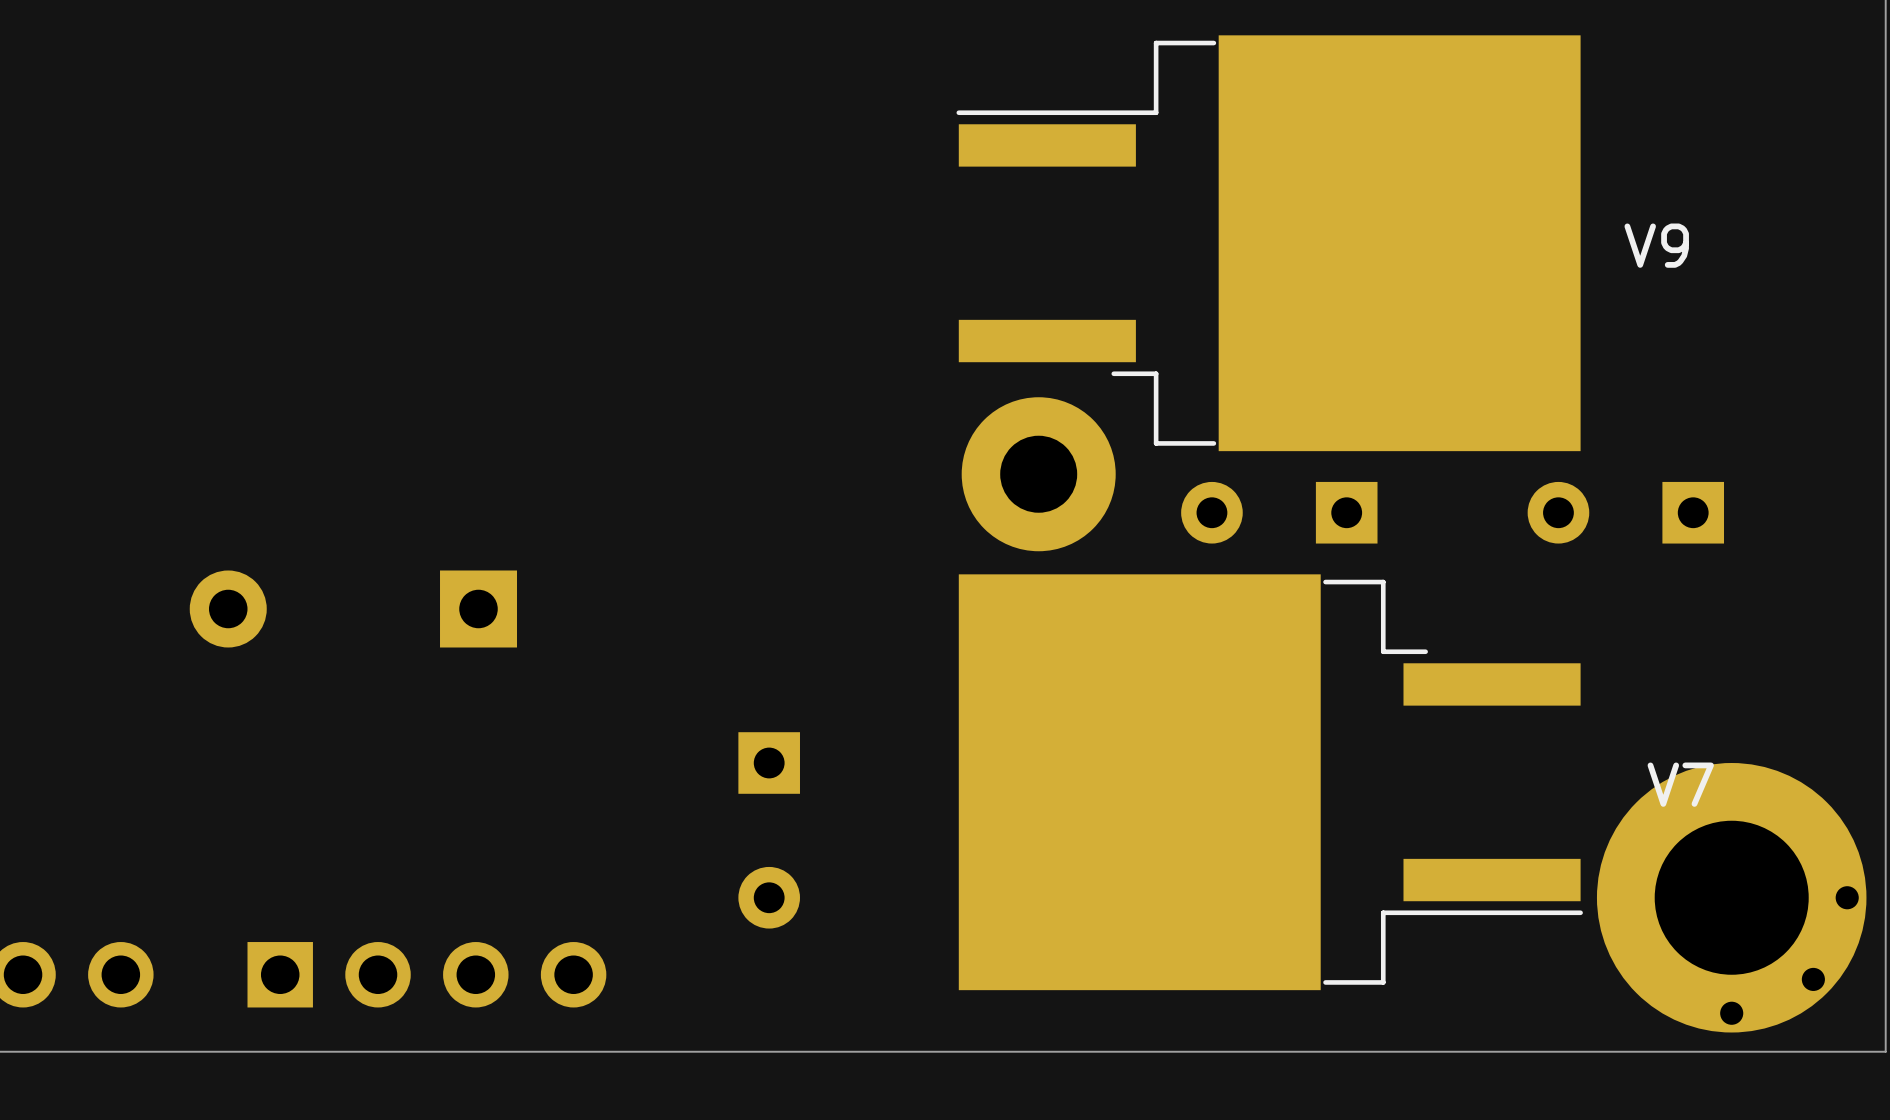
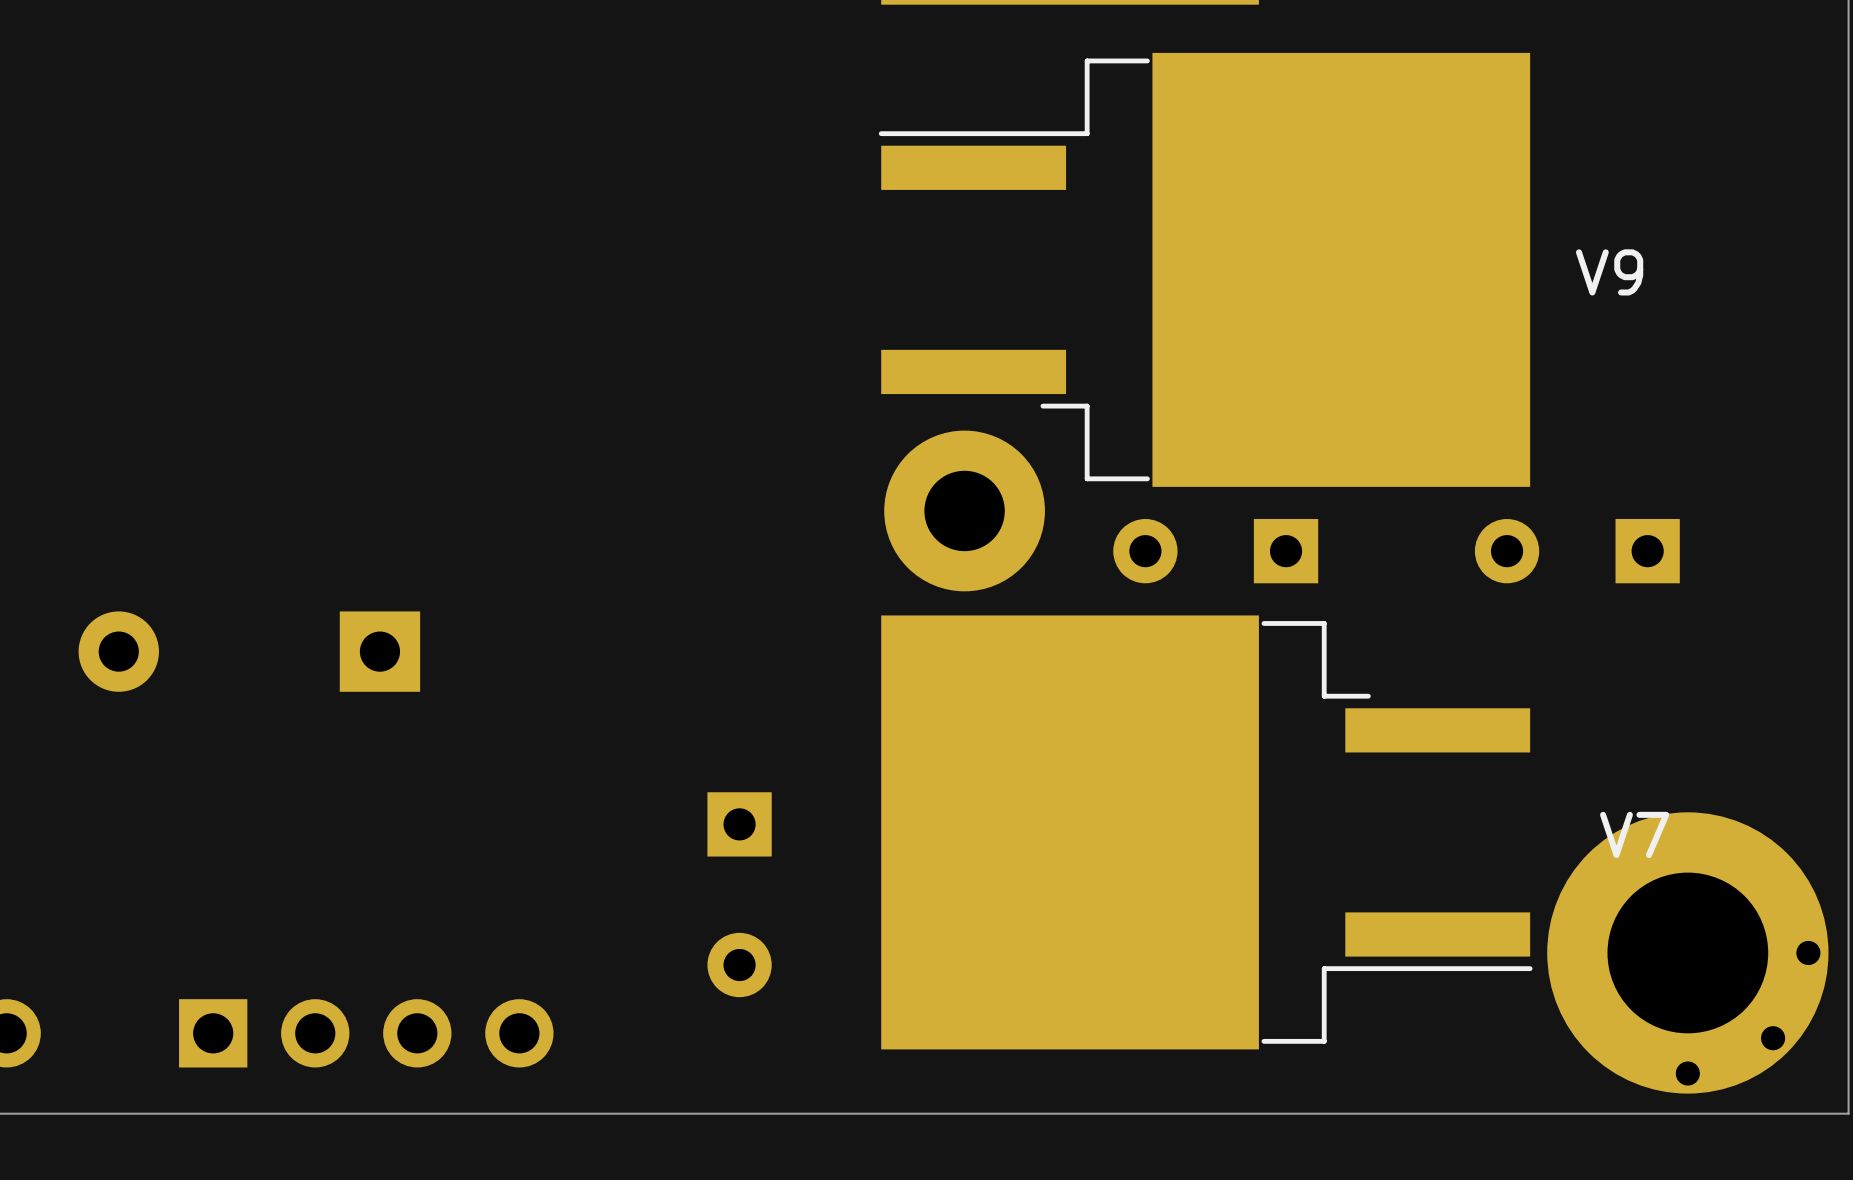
part position: (769, 830) -> (739, 894)
part position: (426, 974) -> (366, 1033)

